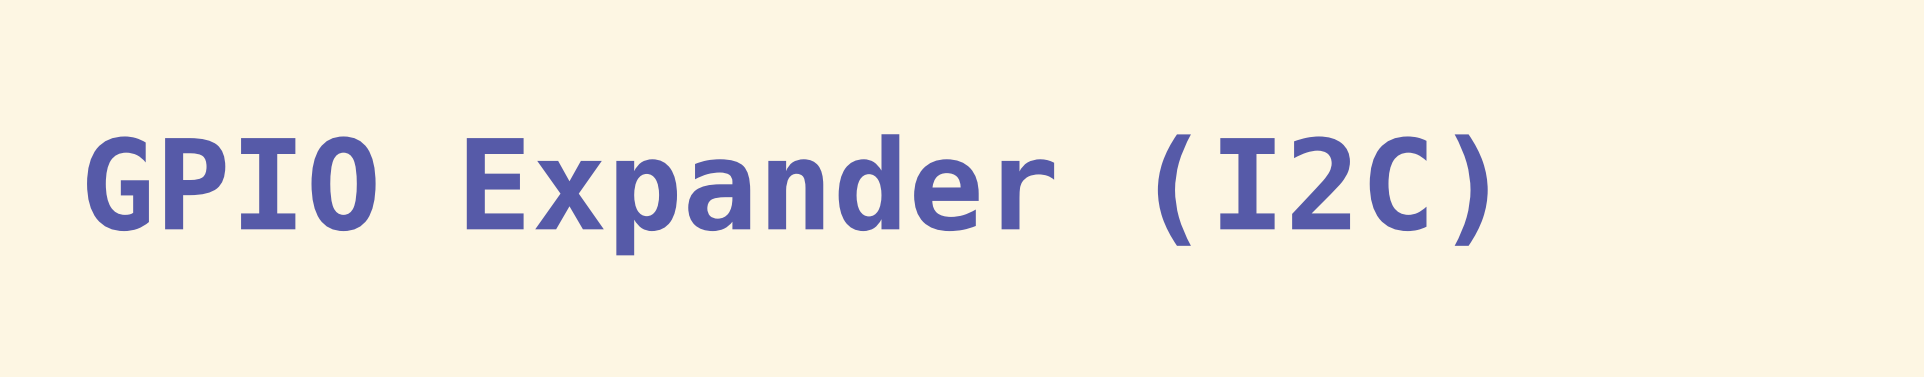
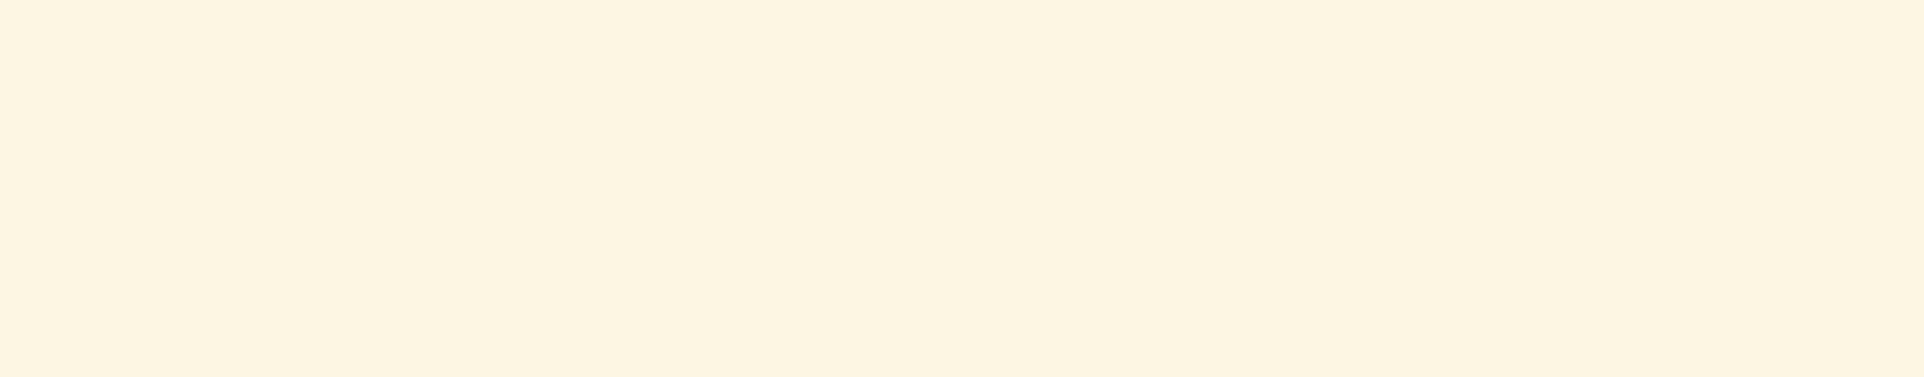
text: GPIO Expander (I2C) (787, 194) -> none

